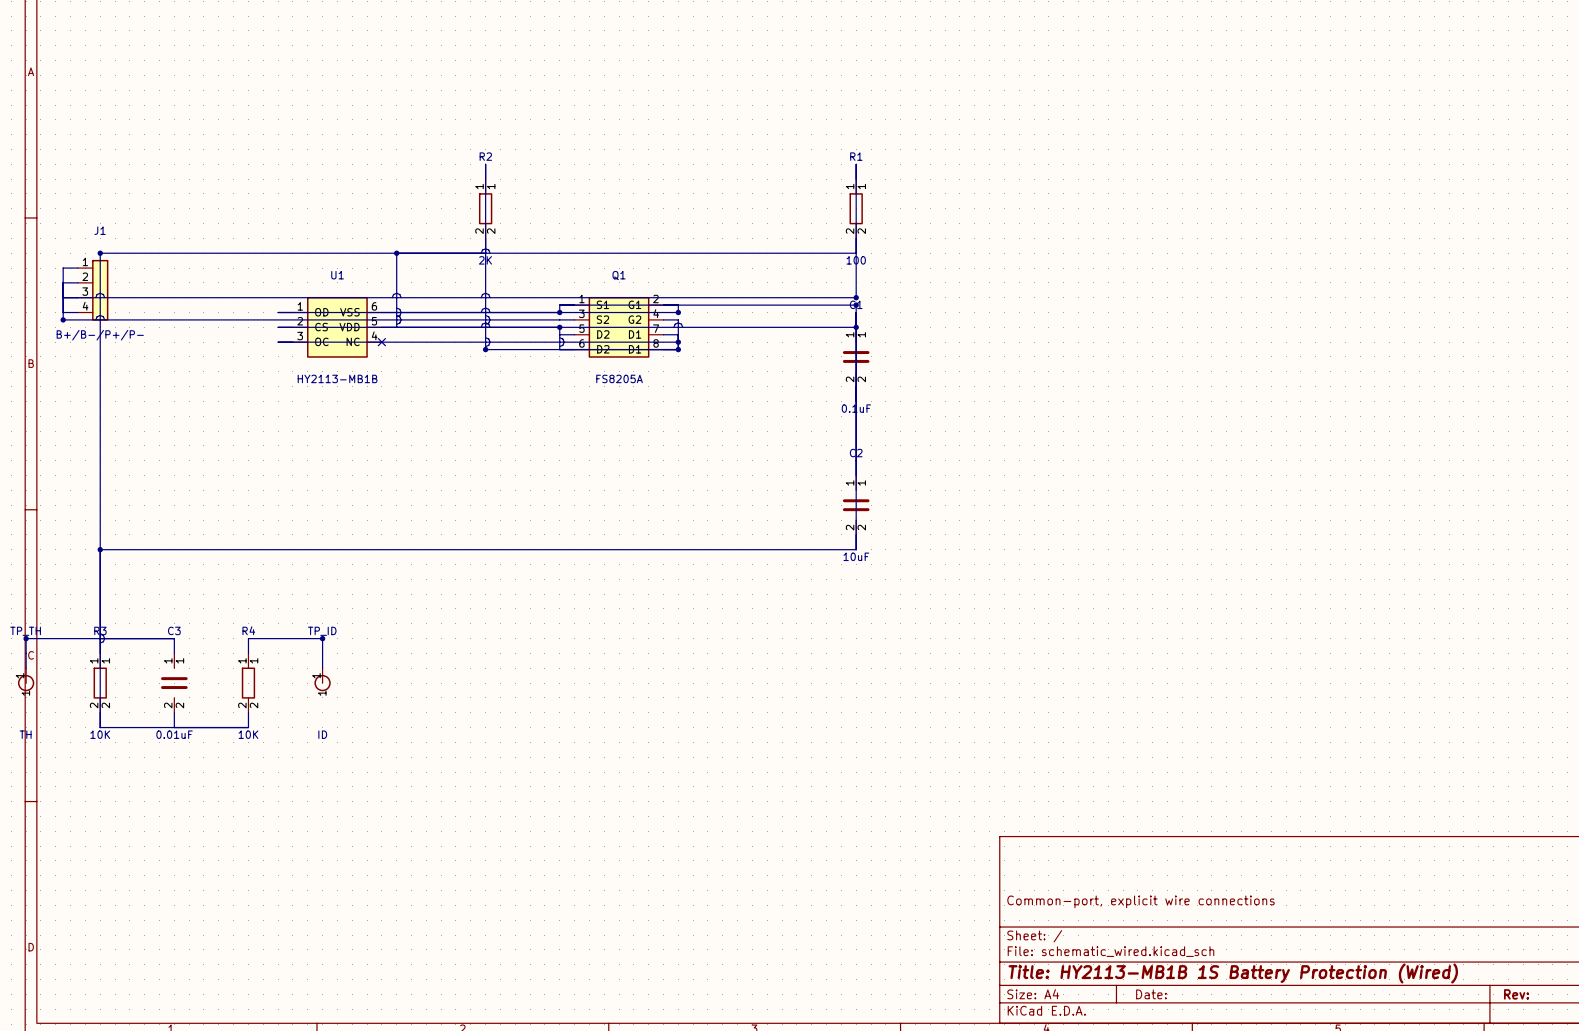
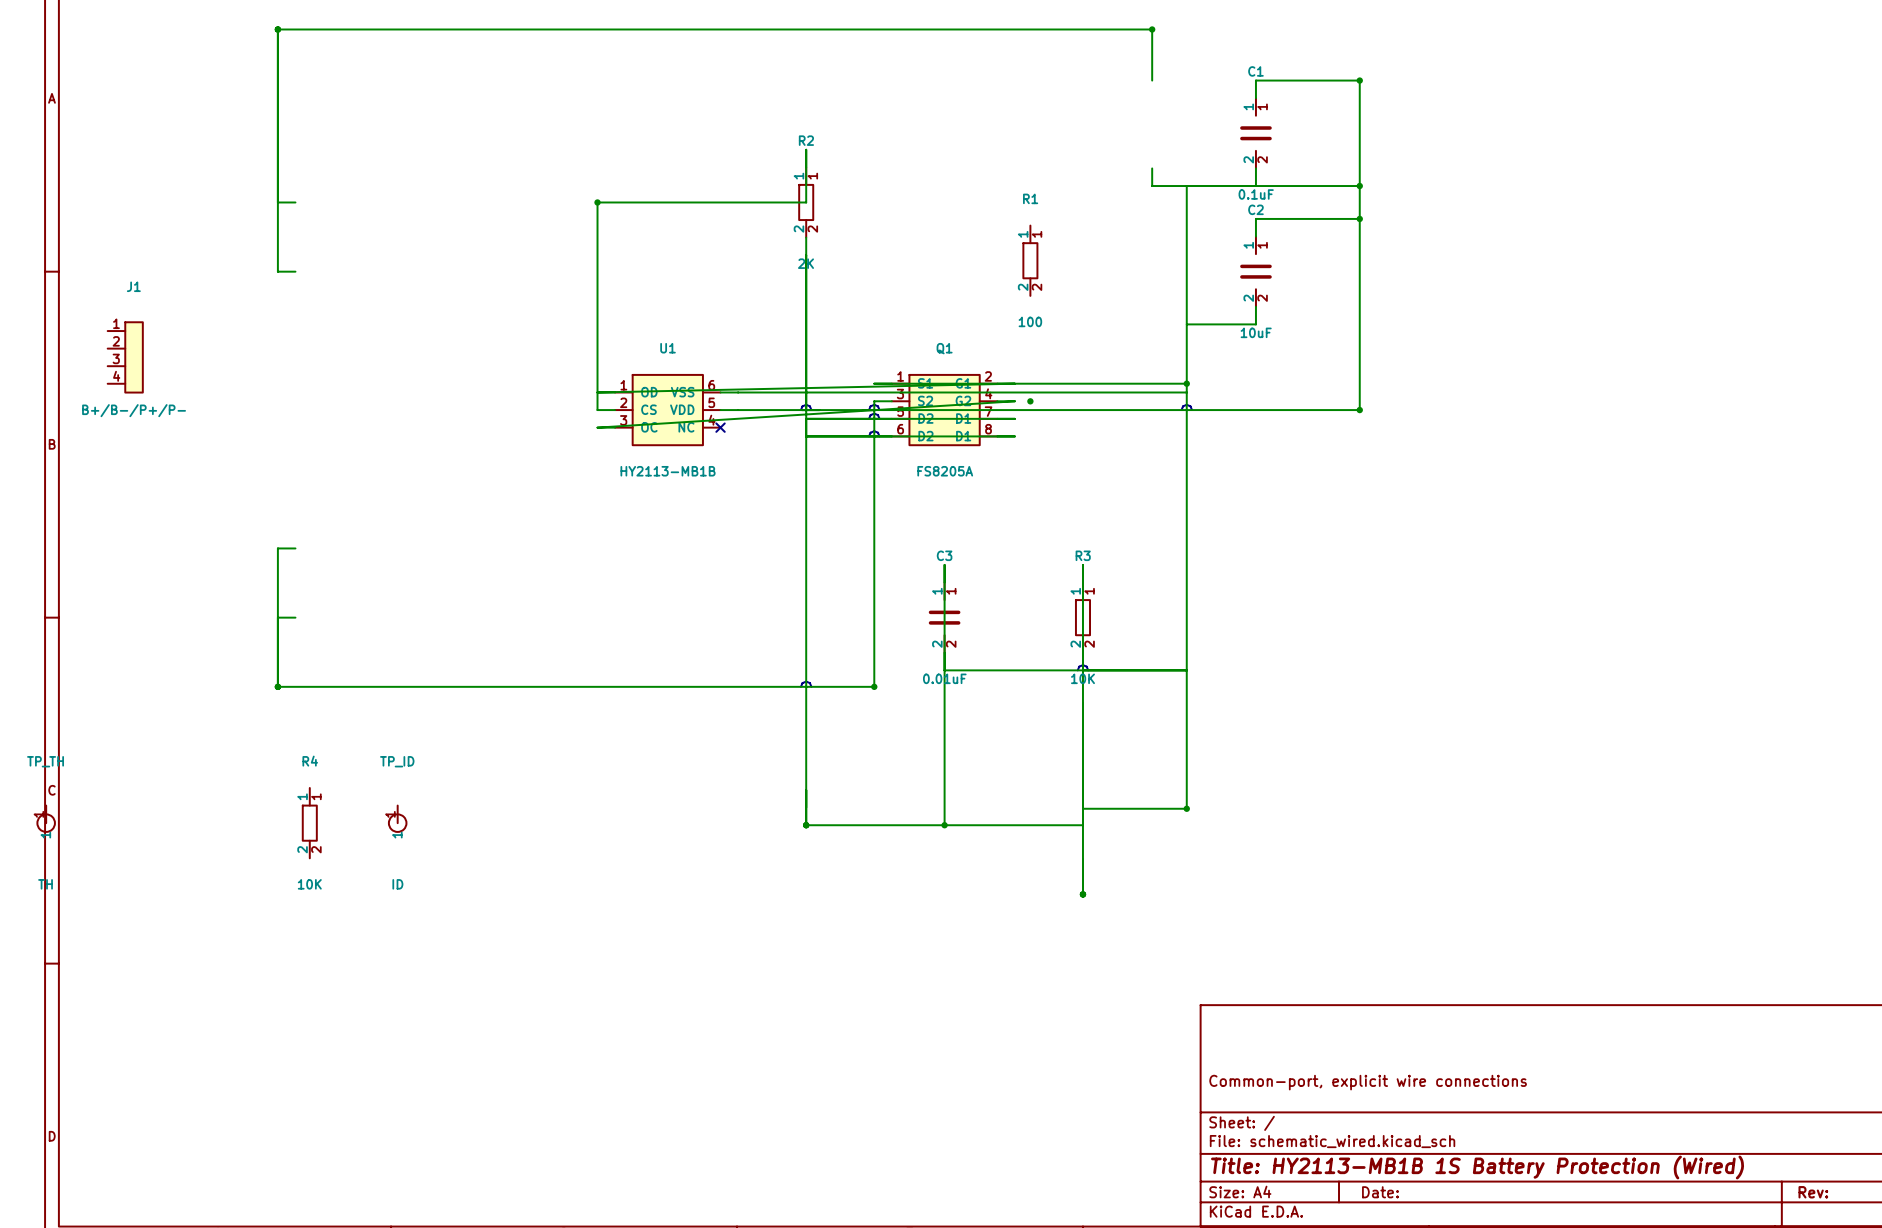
junction: none -> (277, 29)
junction: none -> (1152, 29)
wire: none -> (1152, 80) (1152, 29) (277, 29) (277, 271) (295, 271)
junction: none -> (1359, 80)
wire: none -> (1255, 98) (1255, 80) (1359, 80) (1359, 410) (720, 410)
wire: none -> (806, 149) (806, 202) (597, 202) (597, 410) (615, 410)
wire: none -> (1152, 168) (1152, 186) (1359, 186)
wire: none -> (1255, 168) (1255, 186)
wire: none -> (1186, 186) (1186, 808) (1082, 808)
junction: none -> (1359, 186)
wire: none -> (277, 202) (295, 202)
junction: none -> (597, 202)
wire: (485, 164) (485, 349) (678, 349) (678, 319) (663, 319) -> none
wire: (856, 164) (856, 297) (63, 297) -> none
wire: none -> (1359, 218) (1255, 218) (1255, 236)
junction: none -> (1359, 218)
wire: none -> (806, 237) (806, 825) (1082, 825)
R2 position: (485, 208) -> (806, 202)
wire: none -> (1255, 306) (1255, 324) (1186, 324)
junction: (100, 253) -> none
wire: (396, 253) (396, 327) -> none
junction: (396, 253) -> none
line: (481, 253) (485, 248) (490, 253) -> none
wire: (856, 253) (100, 253) (100, 727) (248, 727) (248, 712) -> none
wire: (78, 268) (63, 268) (63, 319) (574, 319) -> none
wire: (63, 282) (78, 282) -> none
line: (95, 297) (100, 293) (104, 297) -> none
line: (392, 297) (396, 293) (401, 297) -> none
line: (481, 297) (485, 293) (490, 297) -> none
junction: (856, 297) -> none
wire: (678, 305) (678, 312) (278, 312) -> none
junction: (856, 305) -> none
line: (396, 308) (401, 312) (396, 316) -> none
wire: (63, 312) (78, 312) -> none
line: (481, 312) (485, 308) (490, 312) -> none
wire: (559, 312) (559, 305) (856, 305) (856, 549) (100, 549) -> none
junction: (559, 312) -> none
junction: (678, 312) -> none
wire: none -> (874, 383) (1186, 383)
wire: none -> (1014, 383) (597, 392) (615, 392)
junction: none -> (1186, 383)
line: (396, 315) (401, 319) (396, 324) -> none
line: (485, 315) (490, 319) (485, 324) -> none
junction: (63, 319) -> none
line: (95, 319) (100, 315) (104, 319) -> none
wire: none -> (720, 392) (1186, 392)
wire: (278, 327) (856, 327) -> none
U1 position: (337, 327) -> (667, 410)
line: (481, 327) (485, 322) (490, 327) -> none
junction: (559, 327) -> none
Q1 position: (619, 327) -> (944, 410)
line: (673, 327) (678, 322) (682, 327) -> (800, 410) (802, 406) (806, 404) (809, 406) (811, 410)
wire: none -> (891, 401) (874, 401) (874, 686) (277, 686) (277, 548) (295, 548)
wire: none -> (997, 401) (1014, 401) (597, 427) (615, 427)
line: none -> (869, 410) (870, 406) (874, 404) (878, 406) (879, 410)
line: none -> (1181, 410) (1183, 406) (1186, 404) (1190, 406) (1192, 410)
junction: none -> (1359, 410)
line: (485, 337) (490, 342) (485, 346) -> none
line: (559, 337) (564, 342) (559, 346) -> none
wire: (278, 342) (678, 342) -> none
no-connect mark: (381, 342) -> none
wire: none -> (806, 418) (1014, 418)
junction: (678, 342) -> none
line: none -> (869, 418) (870, 415) (874, 413) (878, 415) (879, 418)
junction: (485, 349) -> none
no-connect mark: none -> (720, 427)
junction: (678, 349) -> none
wire: none -> (806, 436) (1014, 436)
line: none -> (869, 436) (870, 432) (874, 431) (878, 432) (879, 436)
C1 position: (856, 356) -> (1255, 133)
wire: none -> (944, 564) (944, 825)
wire: none -> (1082, 564) (1082, 894)
C2 position: (856, 505) -> (1255, 271)
wire: none -> (277, 617) (295, 617)
junction: (100, 549) -> none
wire: none -> (944, 670) (1186, 670)
line: none -> (1077, 670) (1079, 666) (1082, 665) (1086, 666) (1088, 670)
junction: none -> (277, 686)
line: none -> (800, 686) (802, 683) (806, 681) (809, 683) (811, 686)
junction: none -> (874, 686)
line: (100, 634) (104, 638) (100, 643) -> none
junction: (26, 638) -> none
junction: (322, 638) -> none
wire: (174, 653) (174, 638) (26, 638) (26, 668) -> none
wire: (248, 653) (248, 638) (322, 638) (322, 668) -> none
junction: none -> (1186, 808)
R3 position: (100, 683) -> (1082, 617)
C3 position: (174, 683) -> (944, 617)
junction: none -> (806, 825)
junction: none -> (944, 825)
wire: (174, 712) (174, 727) -> none
junction: none -> (1082, 894)

